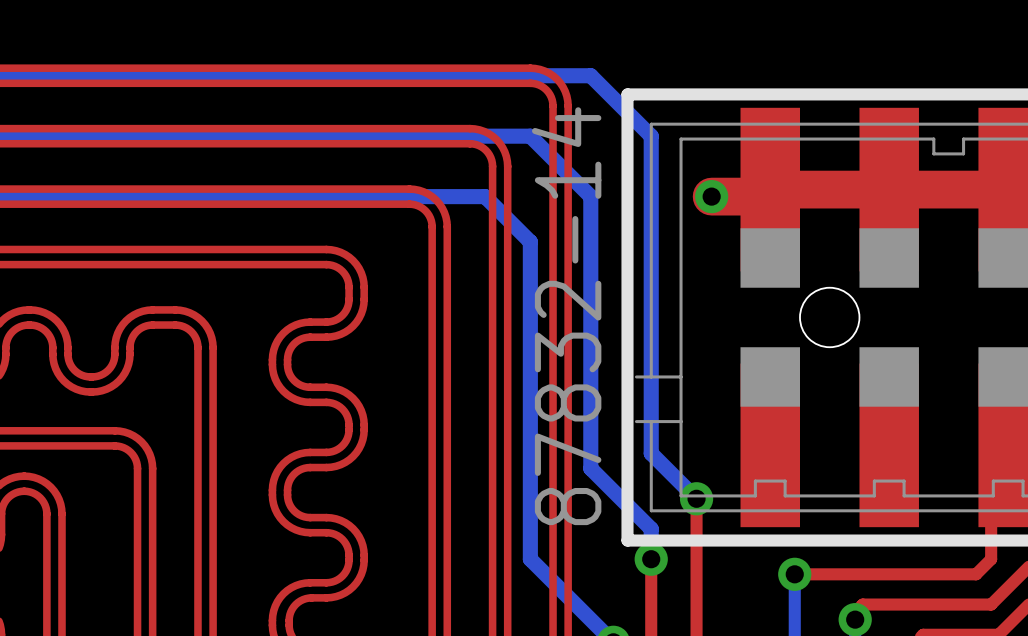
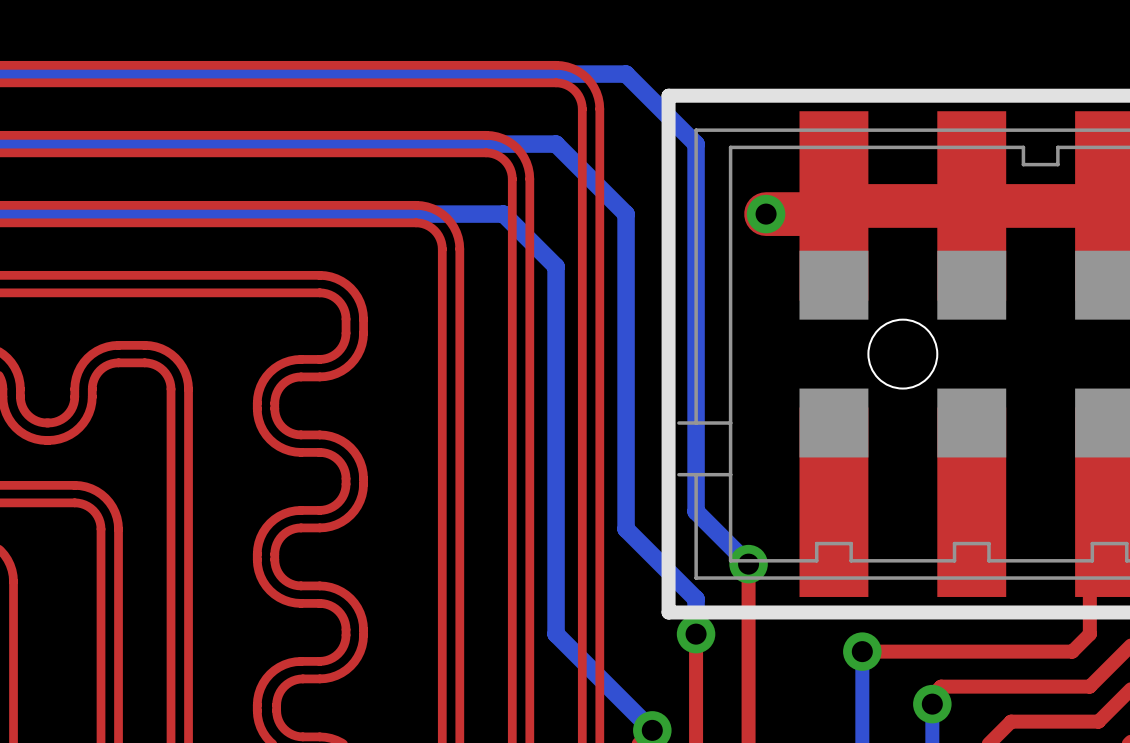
part value: 87832-14 (566, 316) -> none

